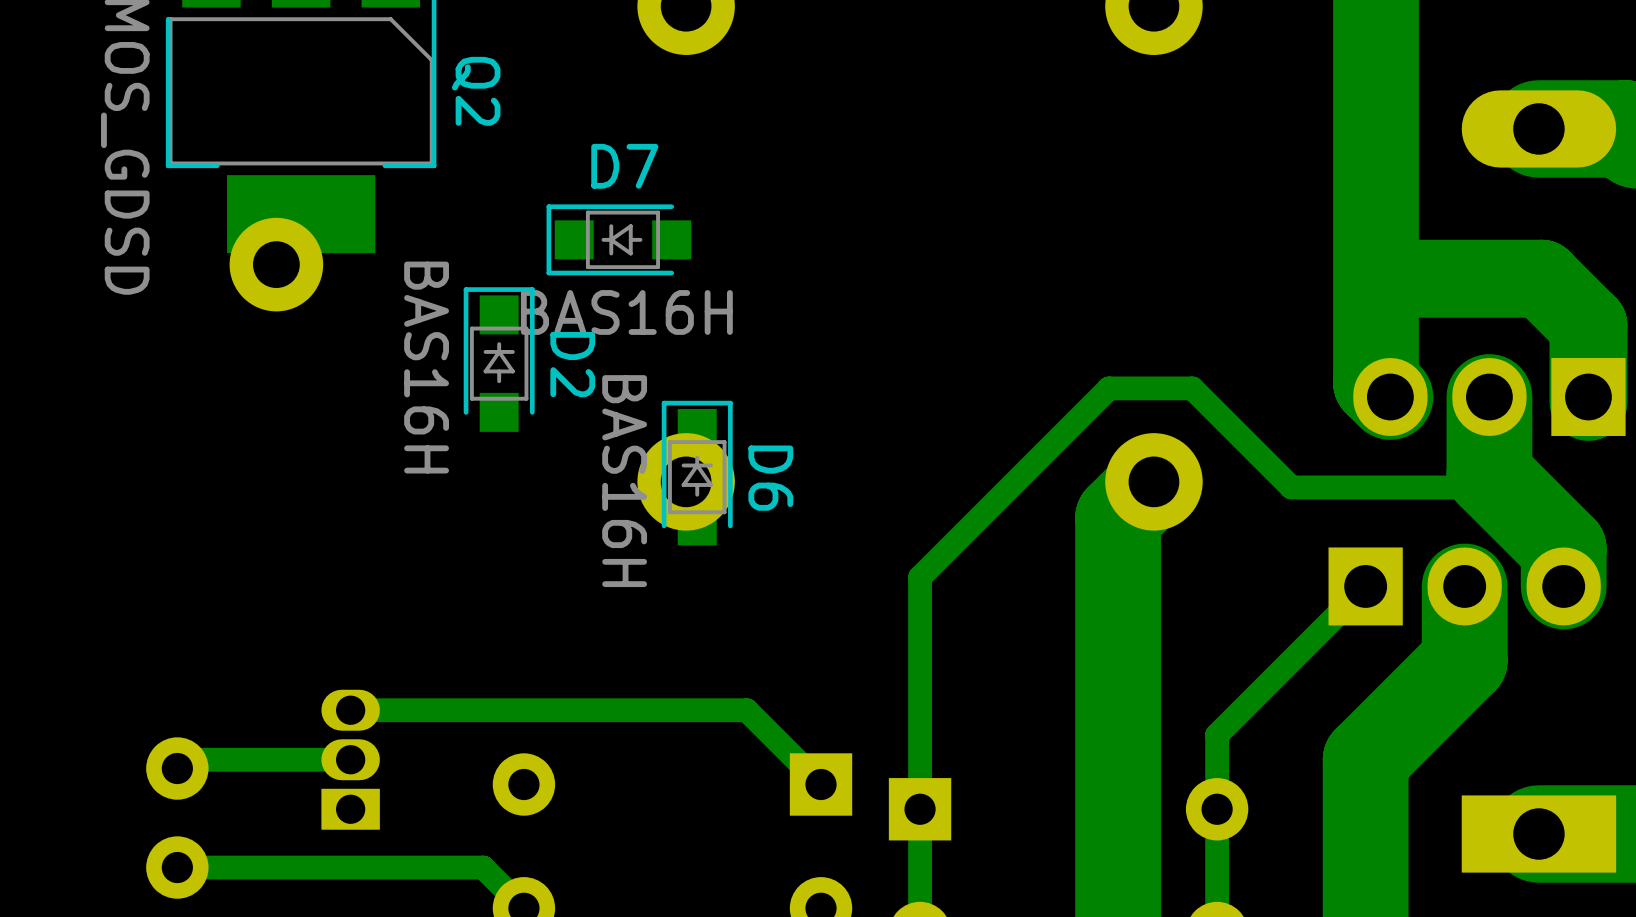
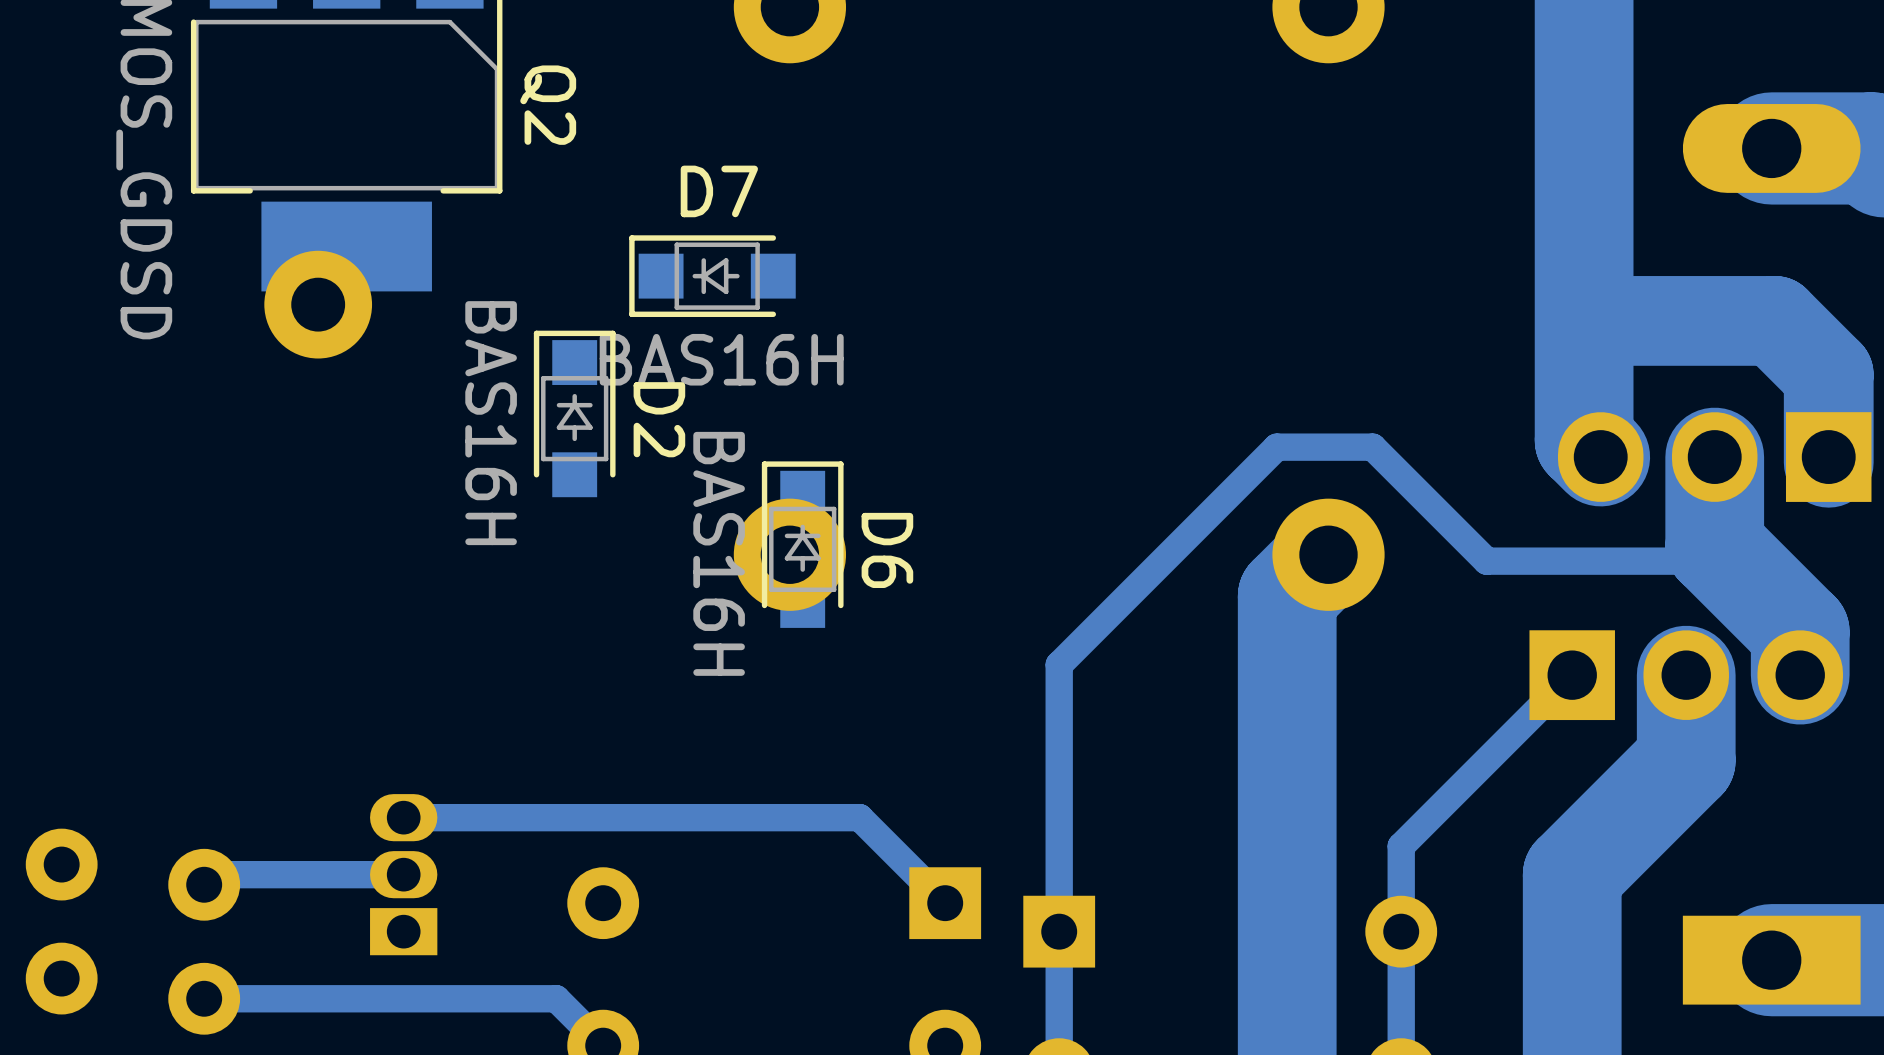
part: none -> (61, 921)

